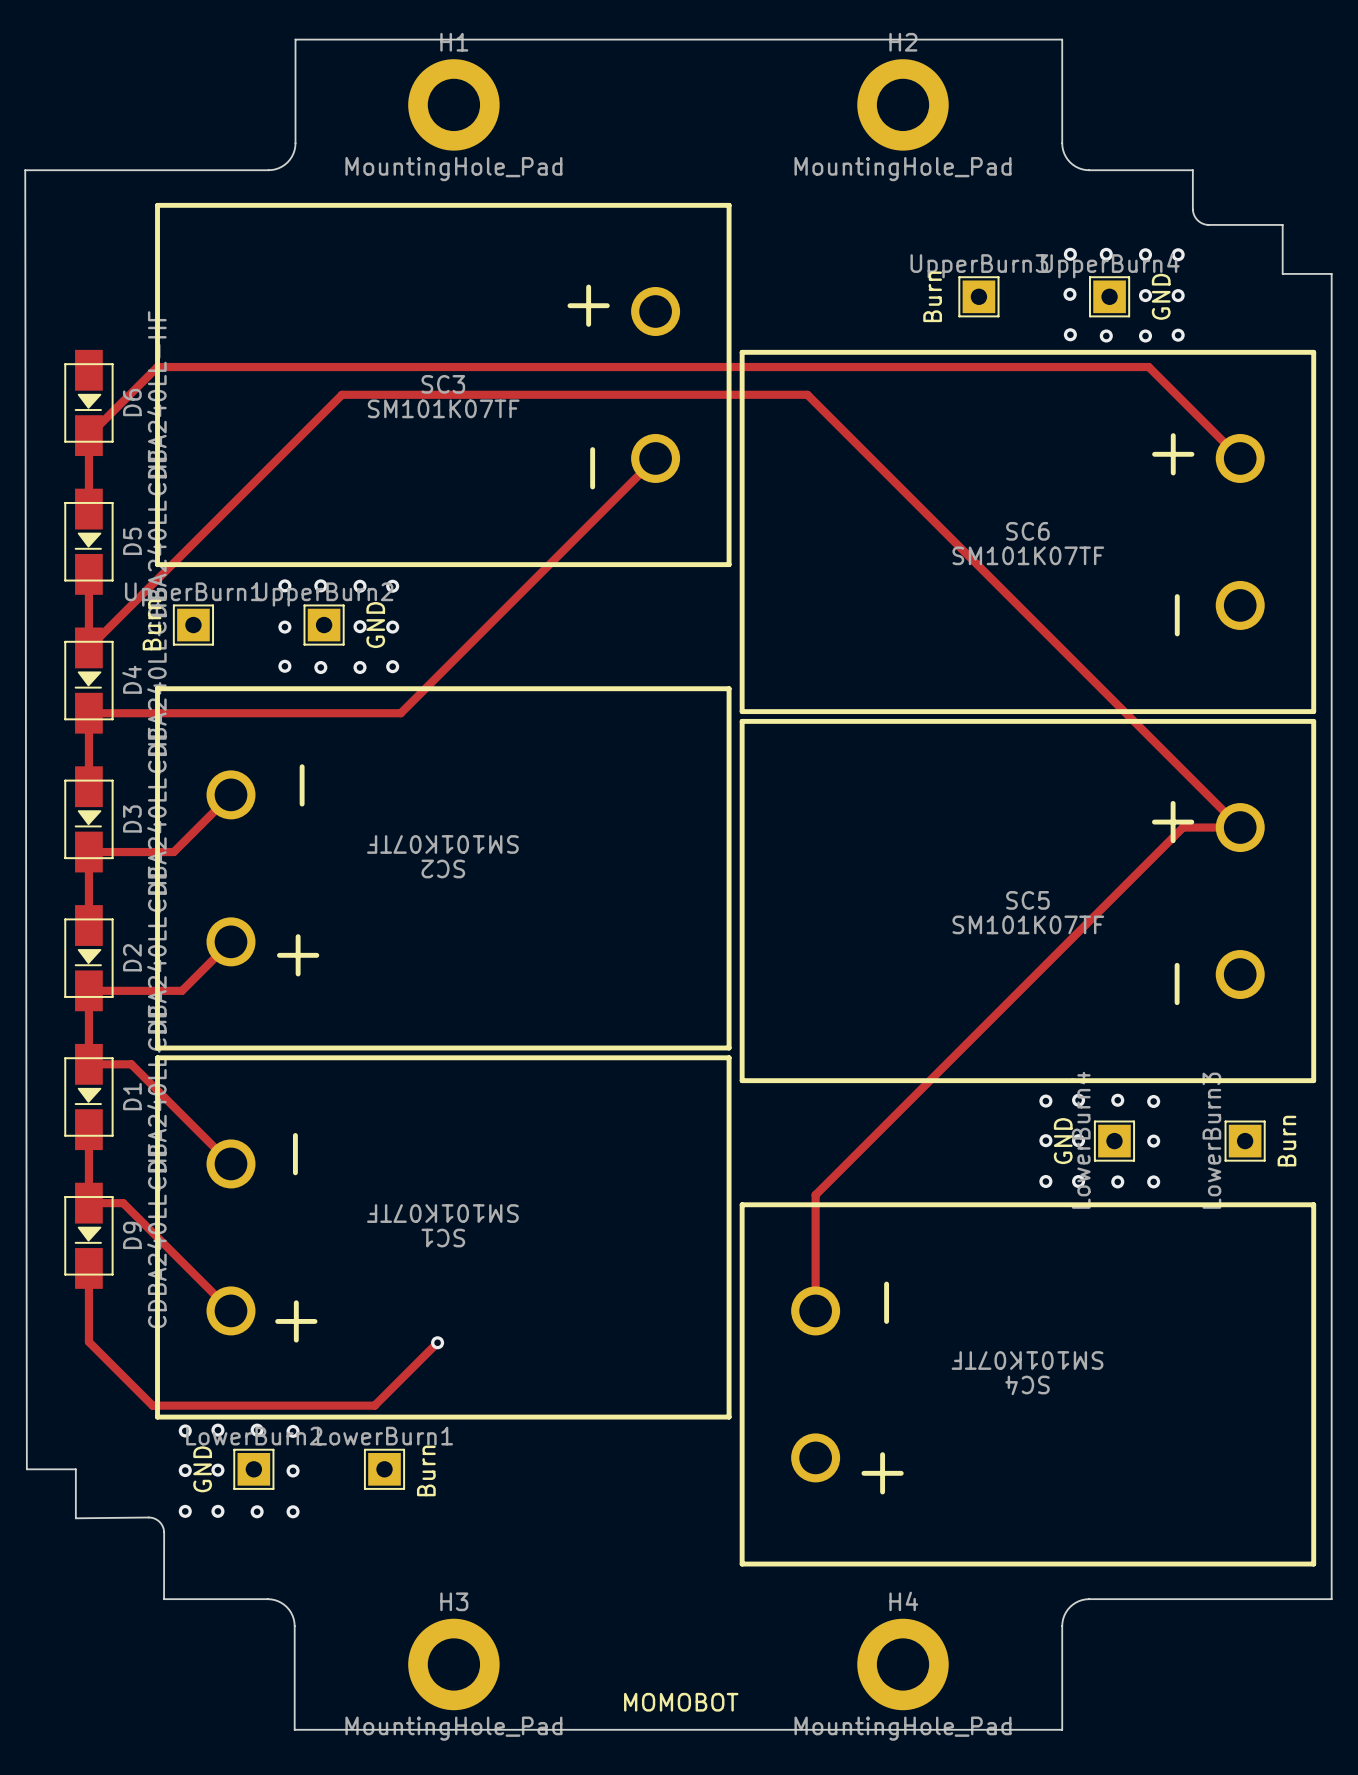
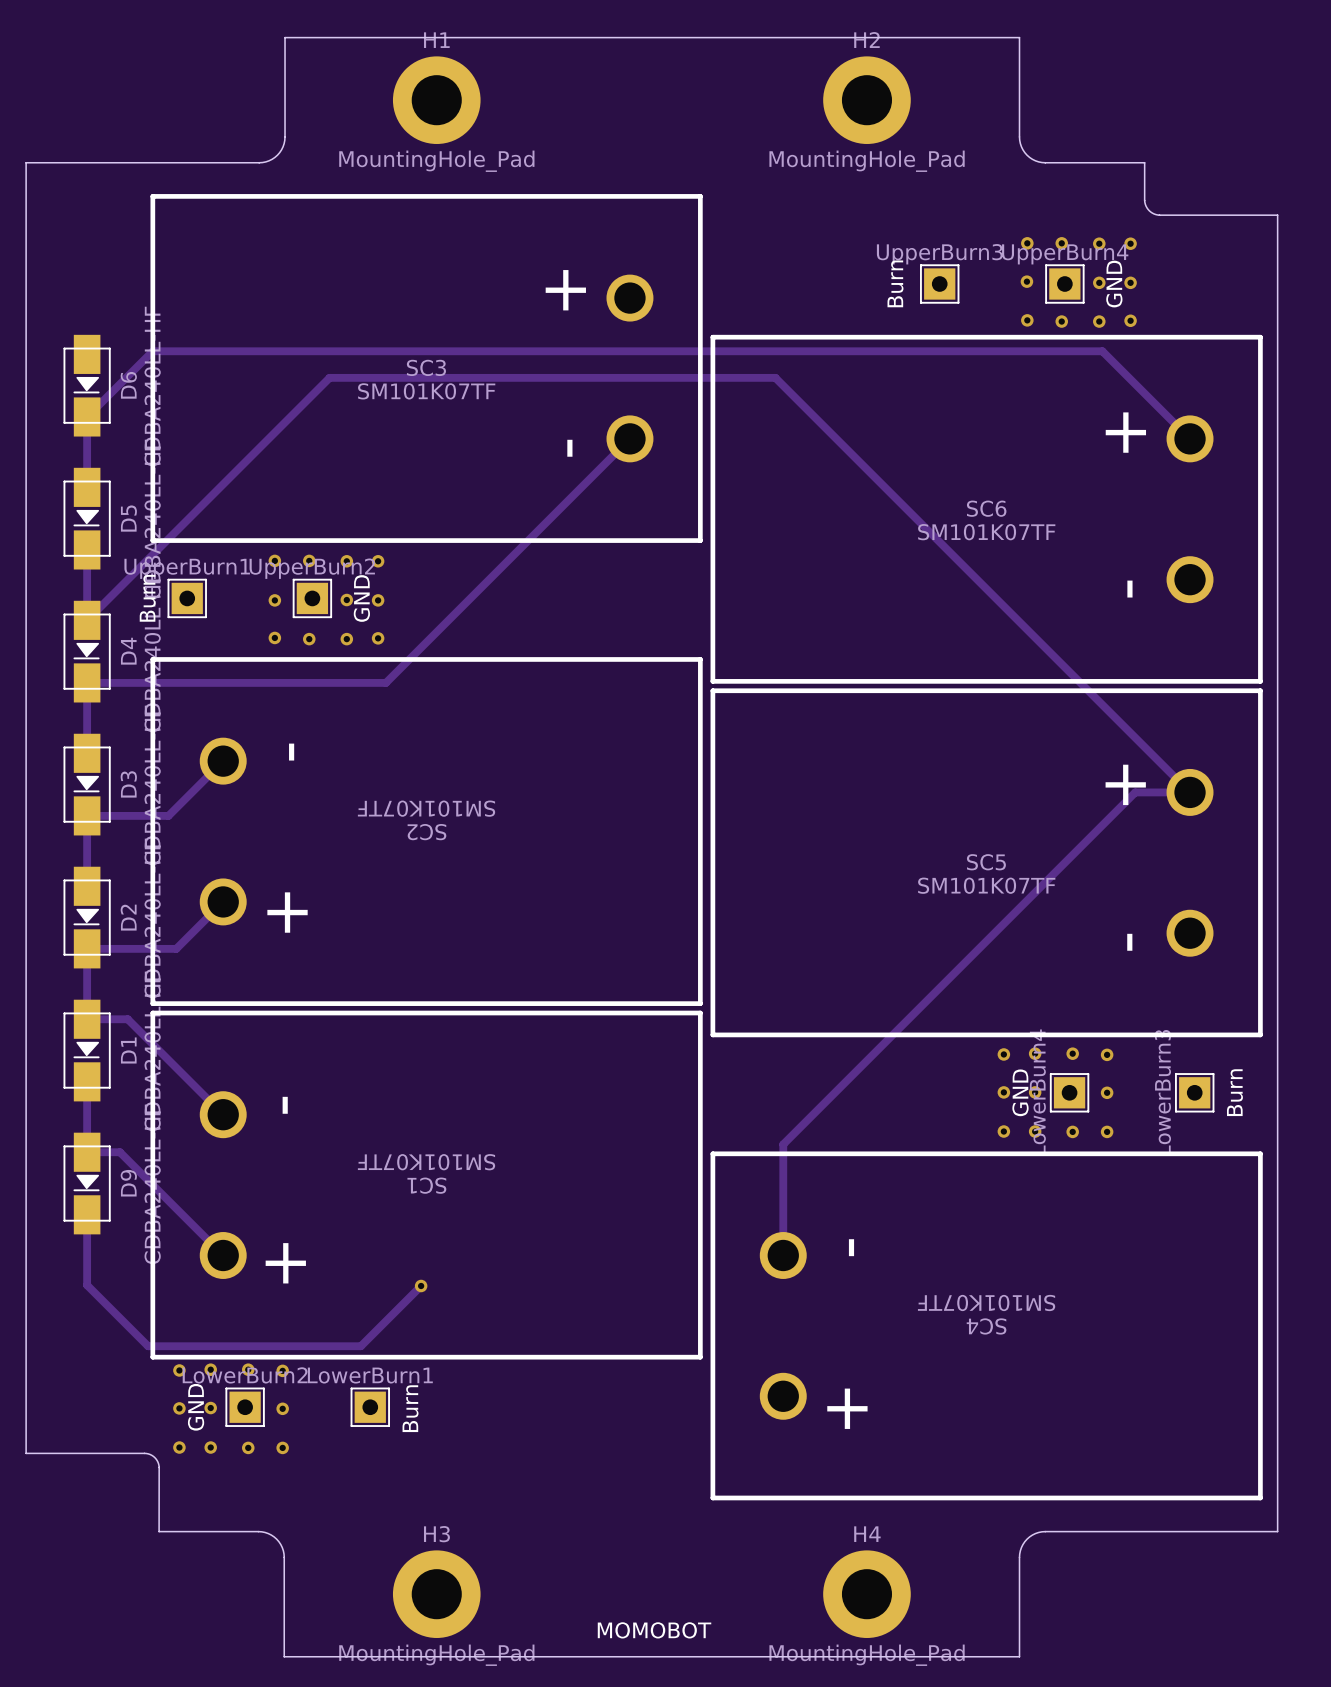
board edge: (25, 170) (26, 1469) (75, 1469) (75, 1518) (148, 1517) -> (26, 162) (26, 1453) (144, 1453)
board edge: (1282, 224) (1282, 273) (1331, 273) -> (1230, 215) (1277, 215) (1277, 262)

